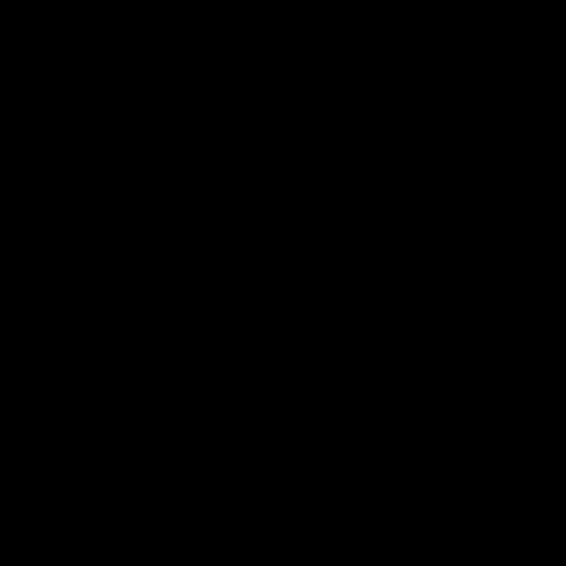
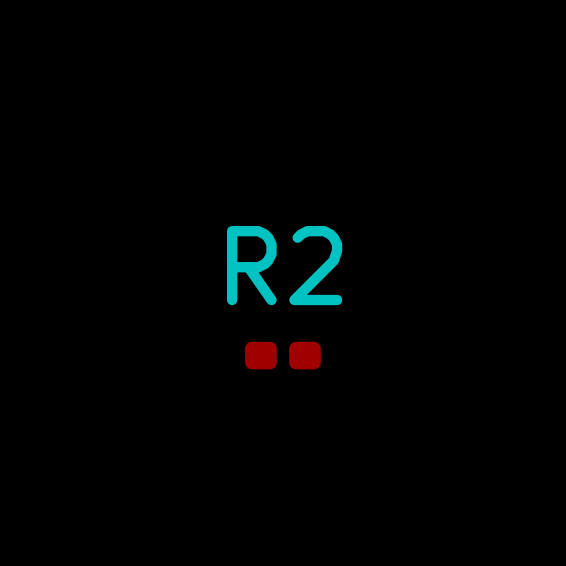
R2: none -> (282, 355)

